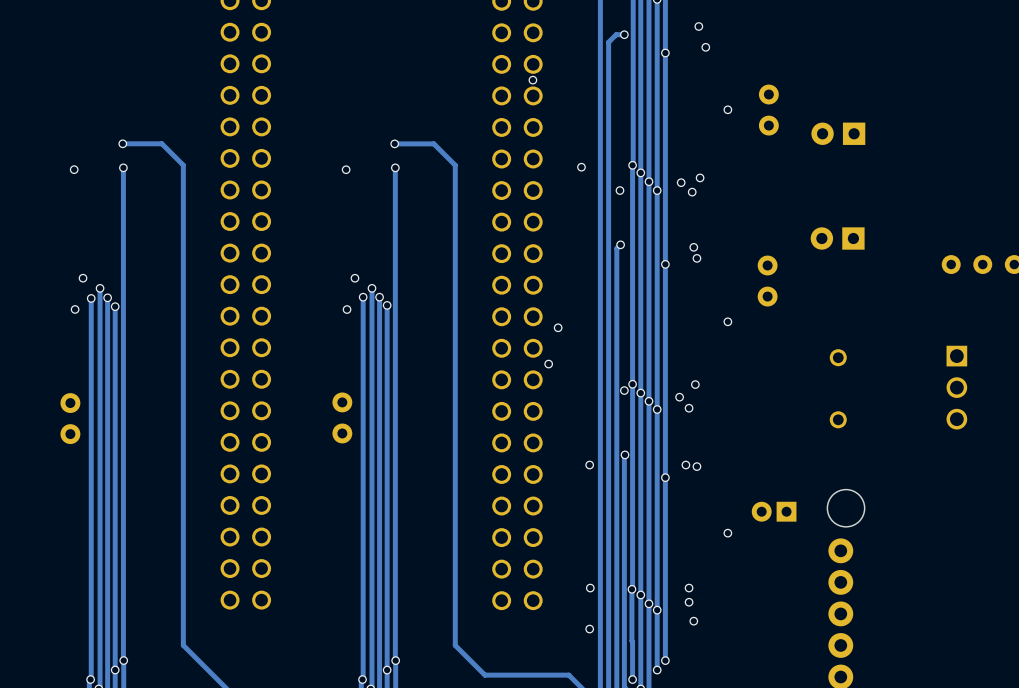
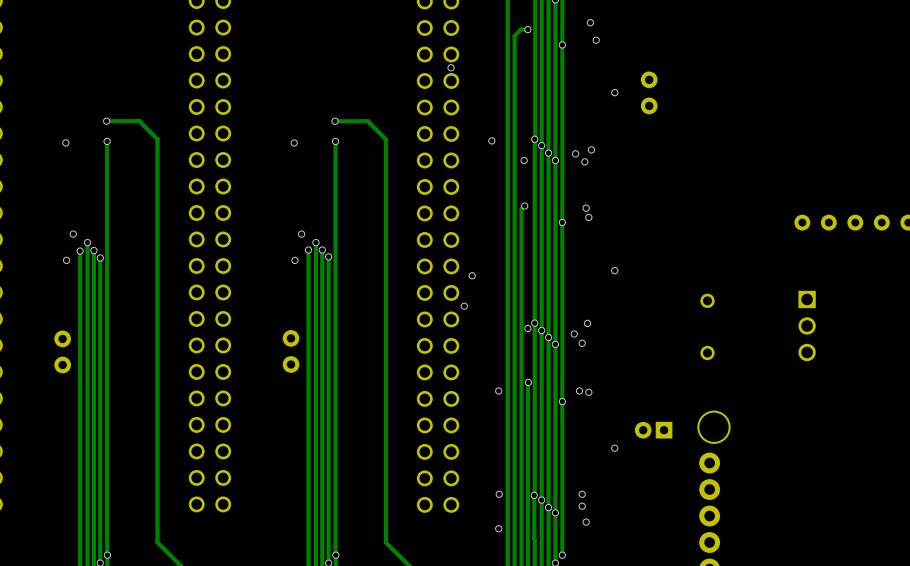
part: (838, 133) -> none
part: (837, 238) -> none
part: (767, 281) -> none

